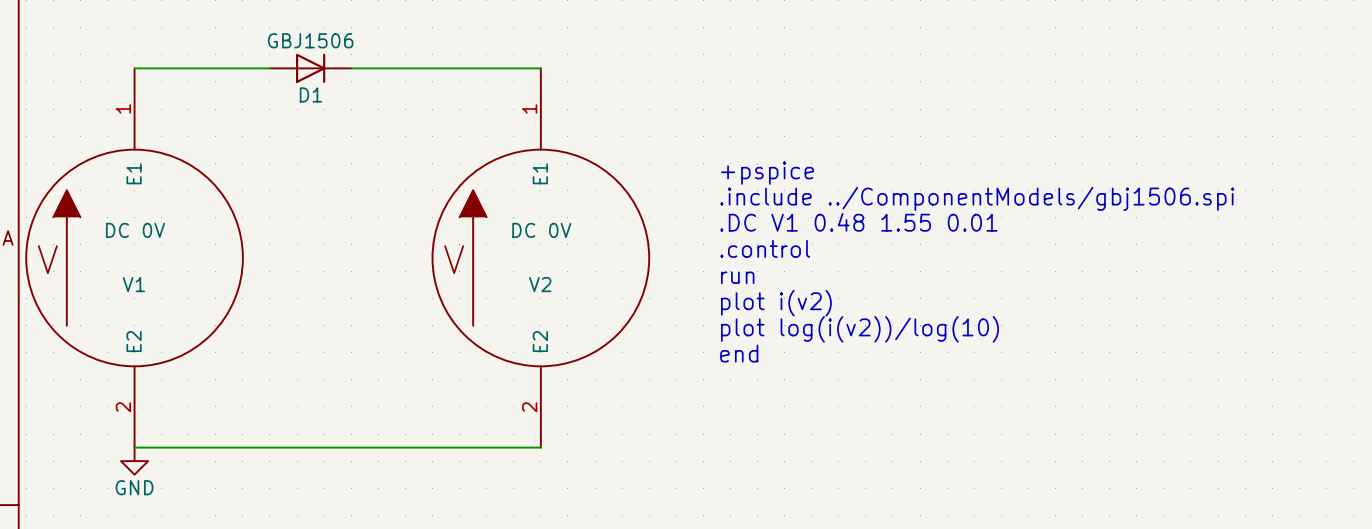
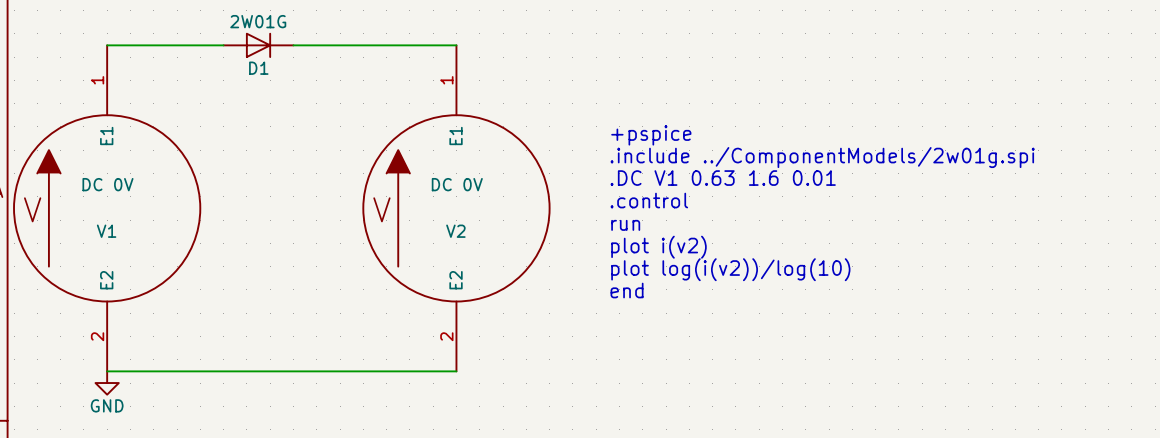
D1 value: GBJ1506 (310, 40) -> 2W01G (258, 21)
text: .include ../ComponentModels/gbj1506.spi (977, 198) -> .include ../ComponentModels/2w01g.spi (822, 157)
text: .DC V1 0.48 1.55 0.01 (858, 222) -> .DC V1 0.63 1.6 0.01 (723, 178)

